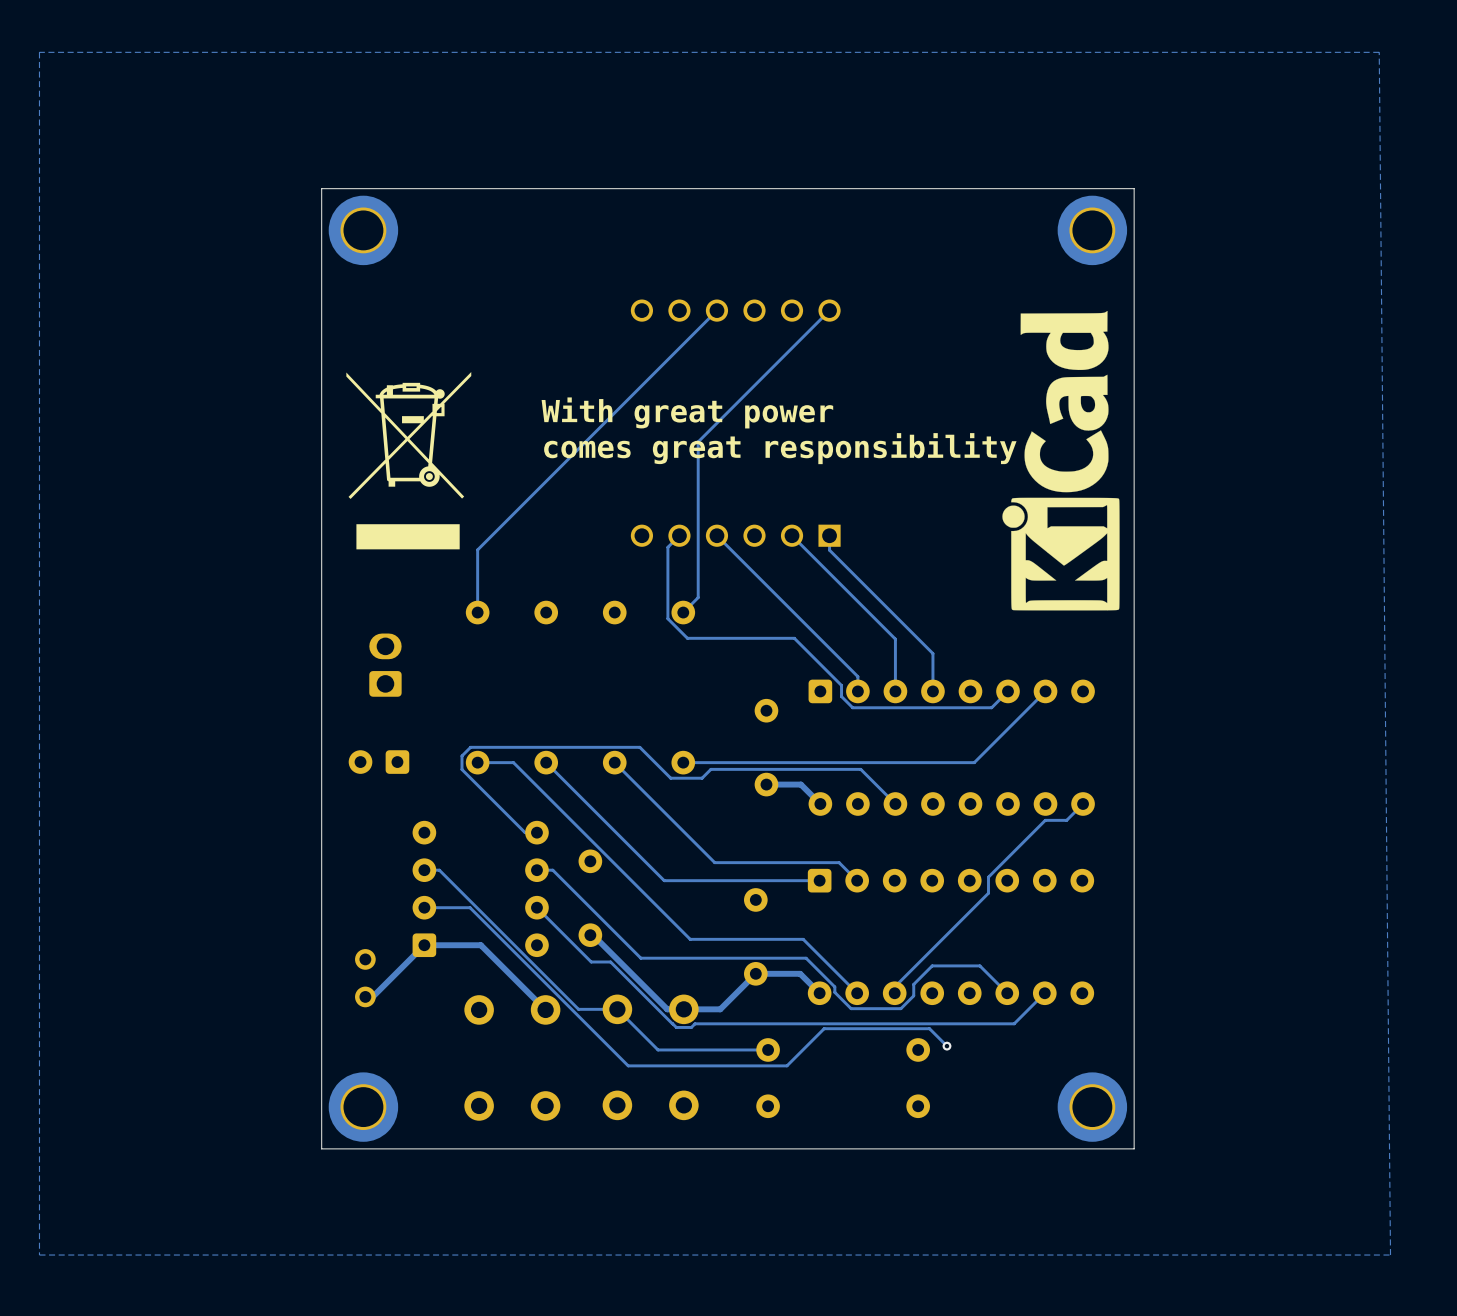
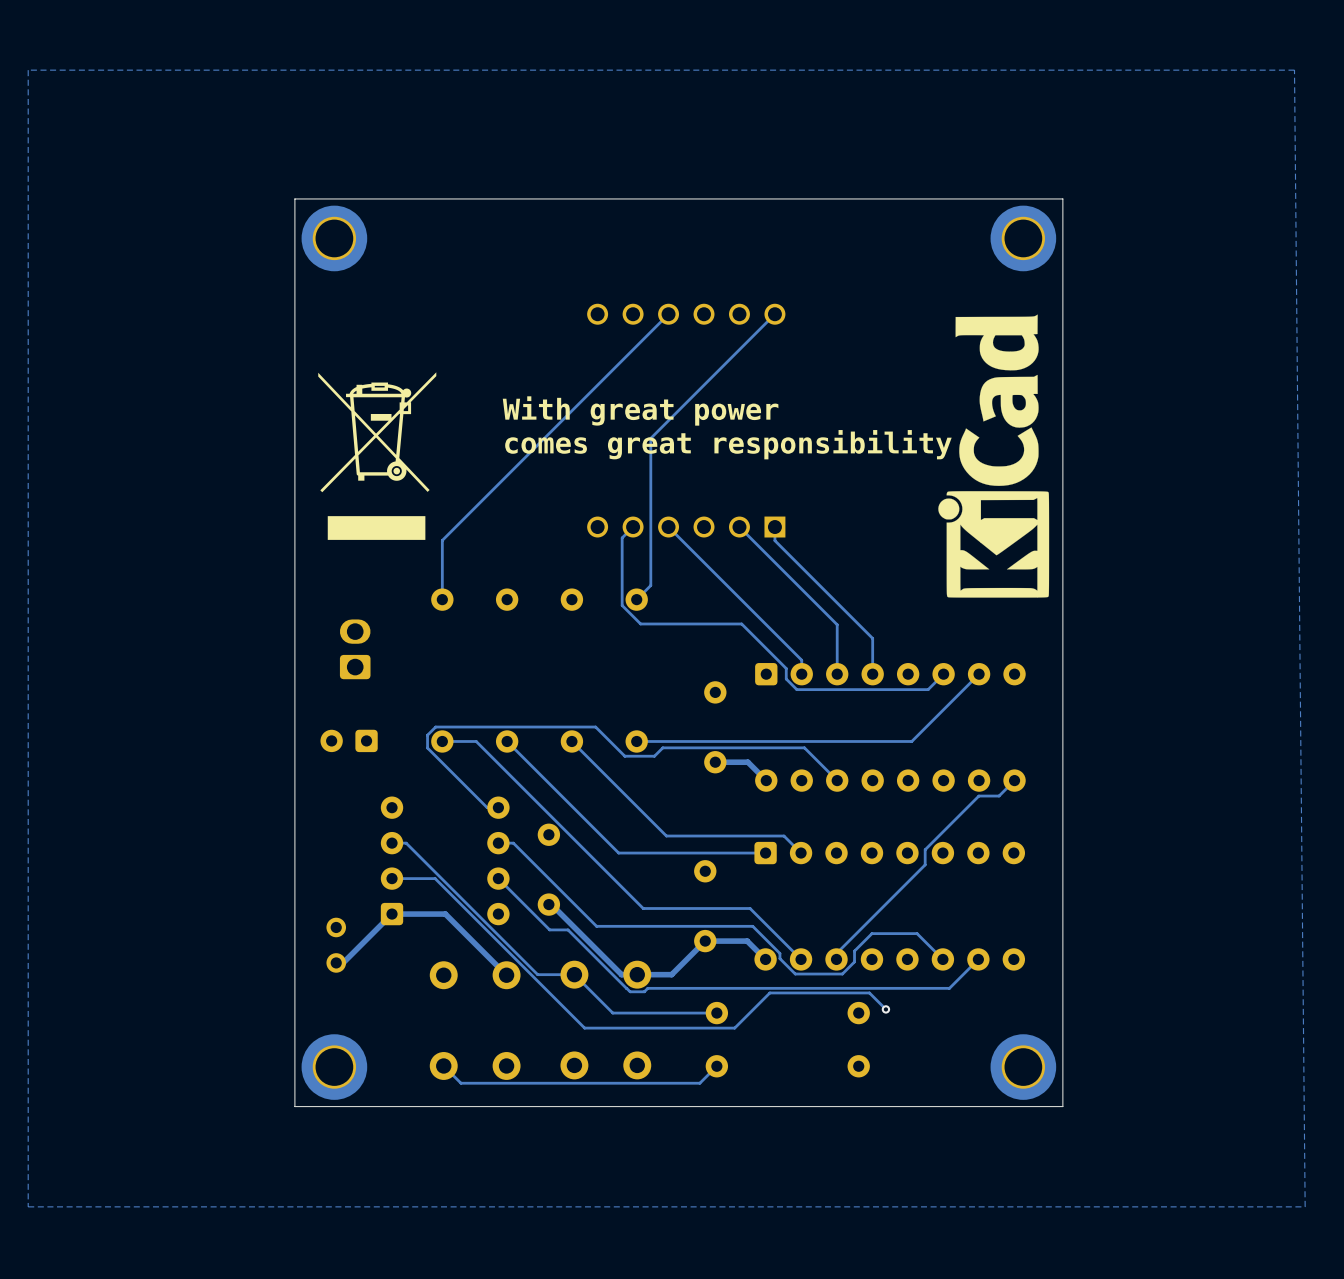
track: none -> (443, 1065) (460, 1083) (699, 1083) (716, 1066)

